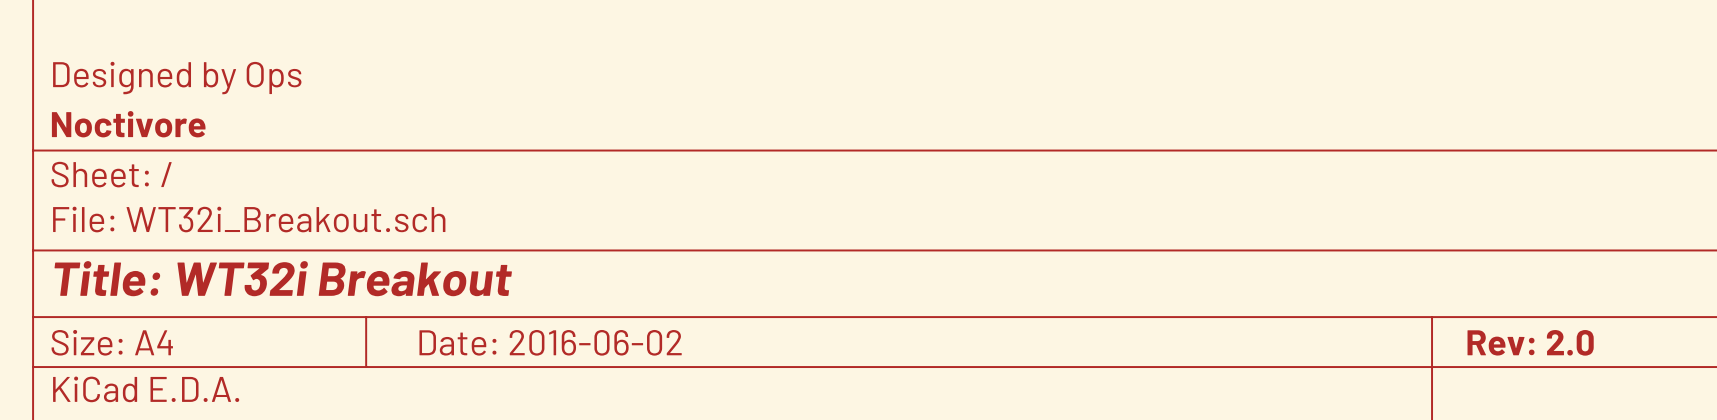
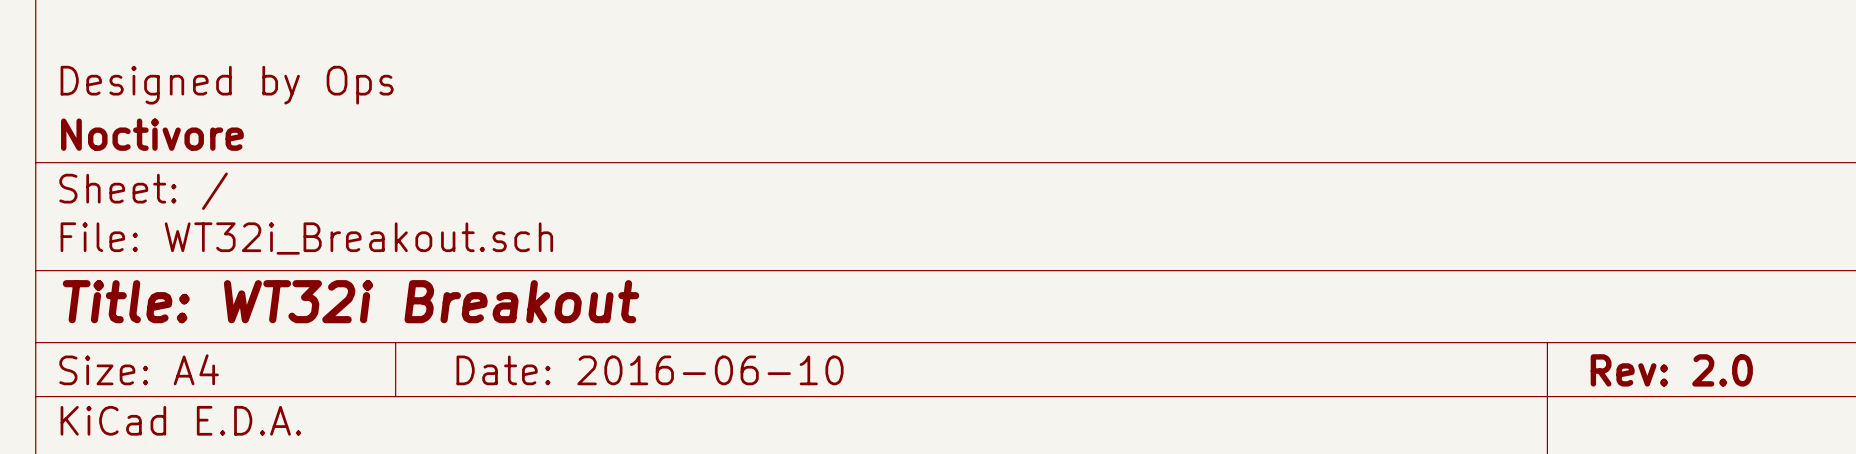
title block: Date: 2016-06-02 (550, 342) -> Date: 2016-06-10 (650, 370)

